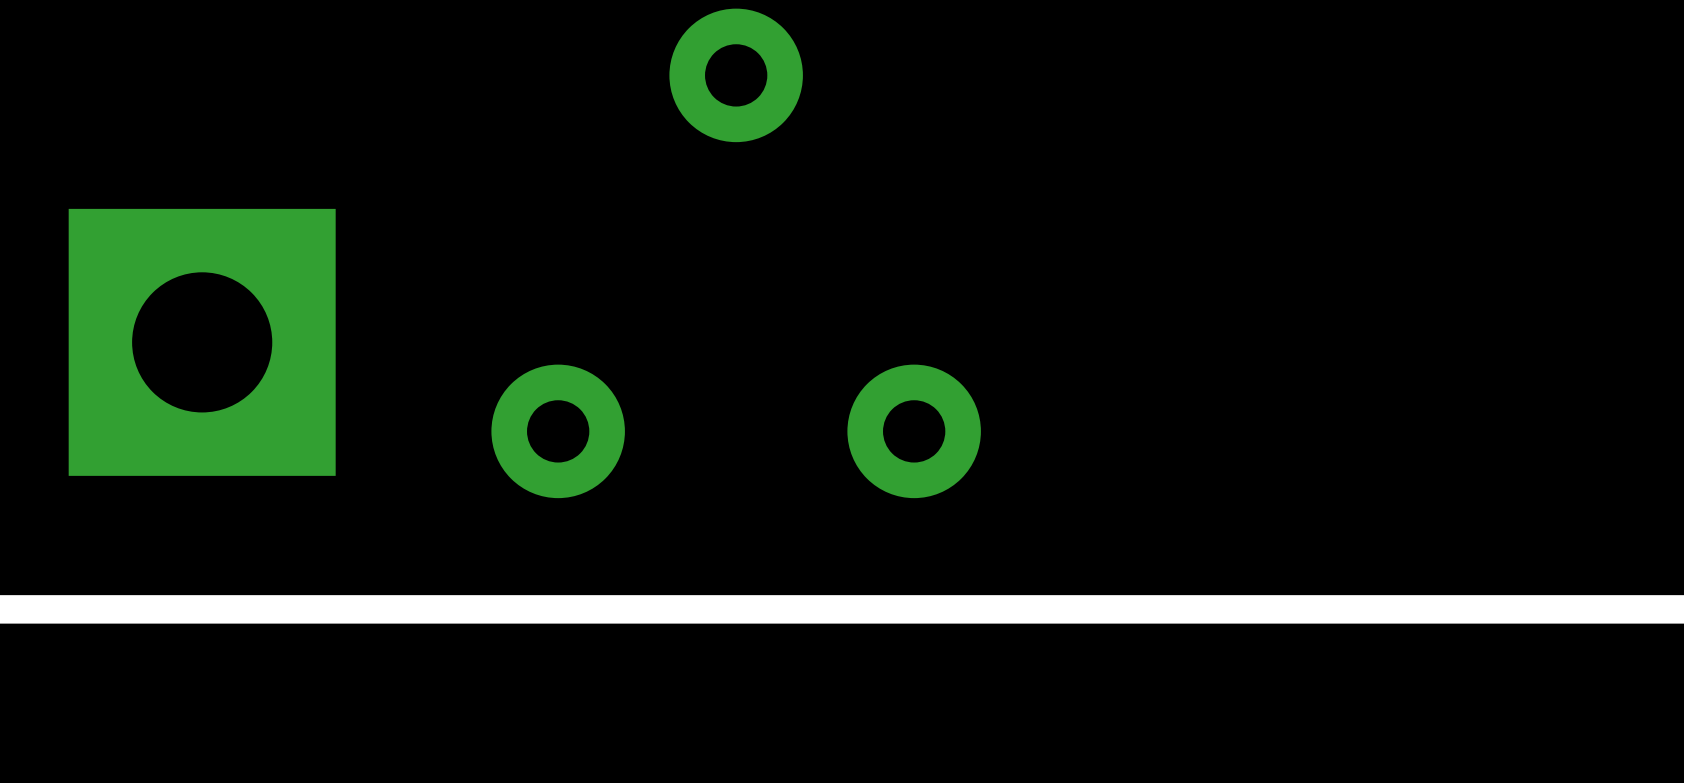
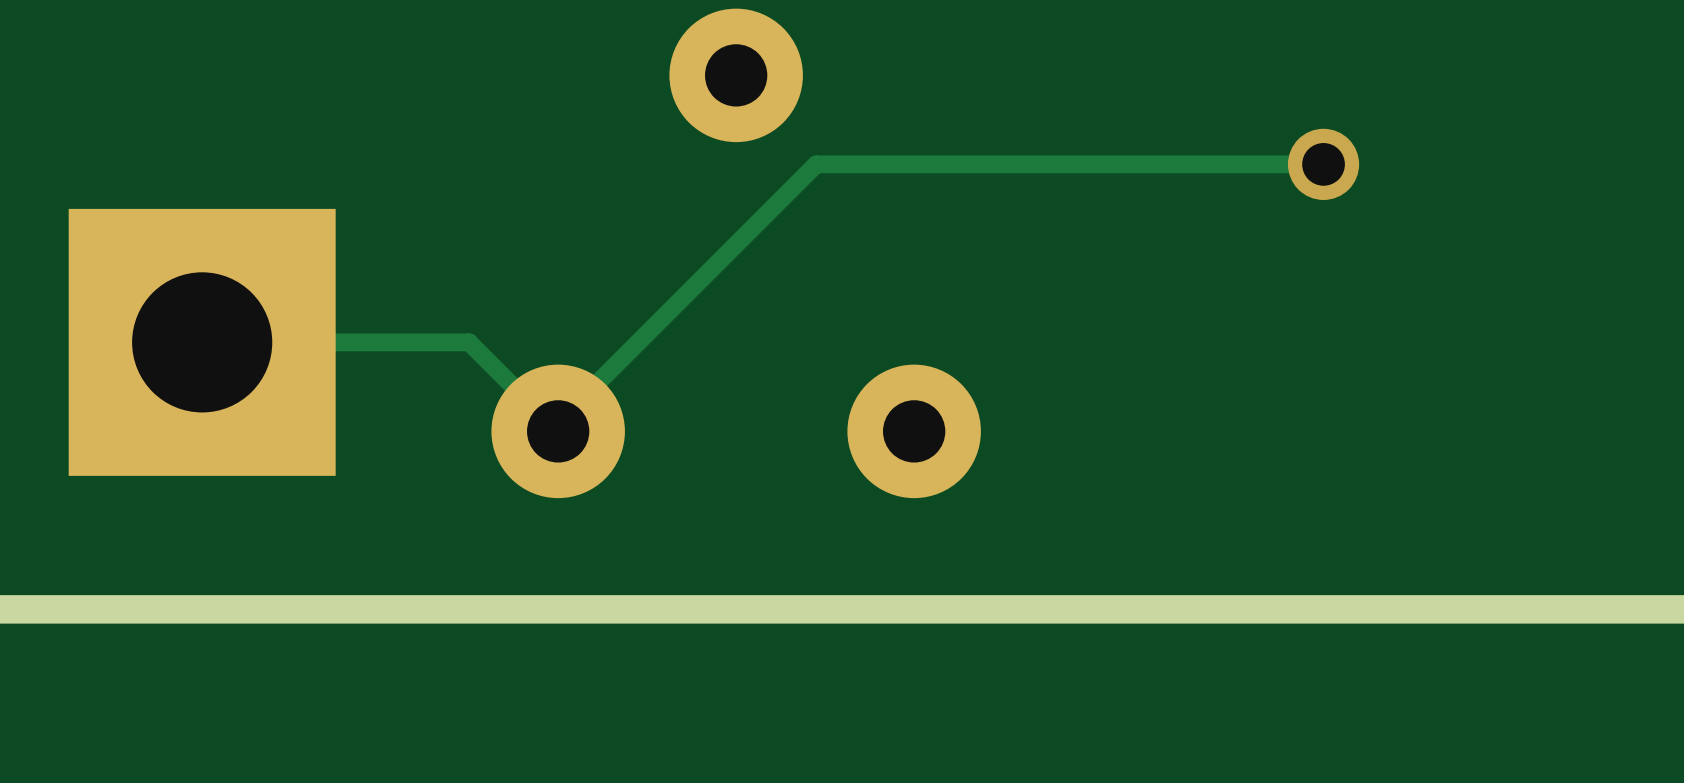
track: none -> (1323, 164) (816, 164) (558, 422) (558, 431) (469, 342) (202, 342)
via: none -> (1323, 164)

